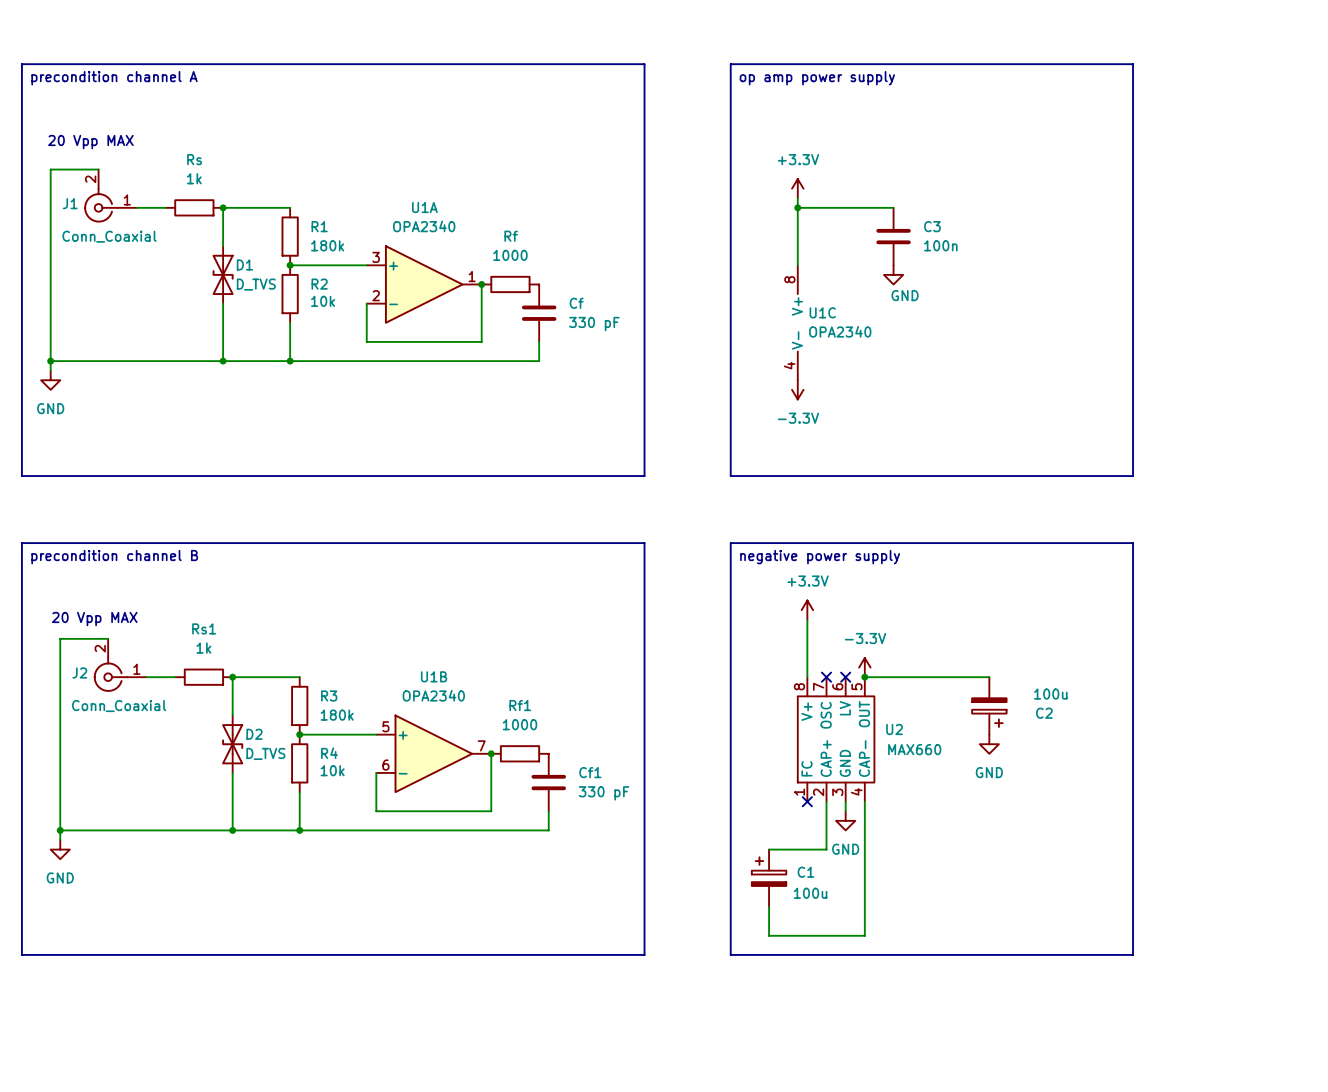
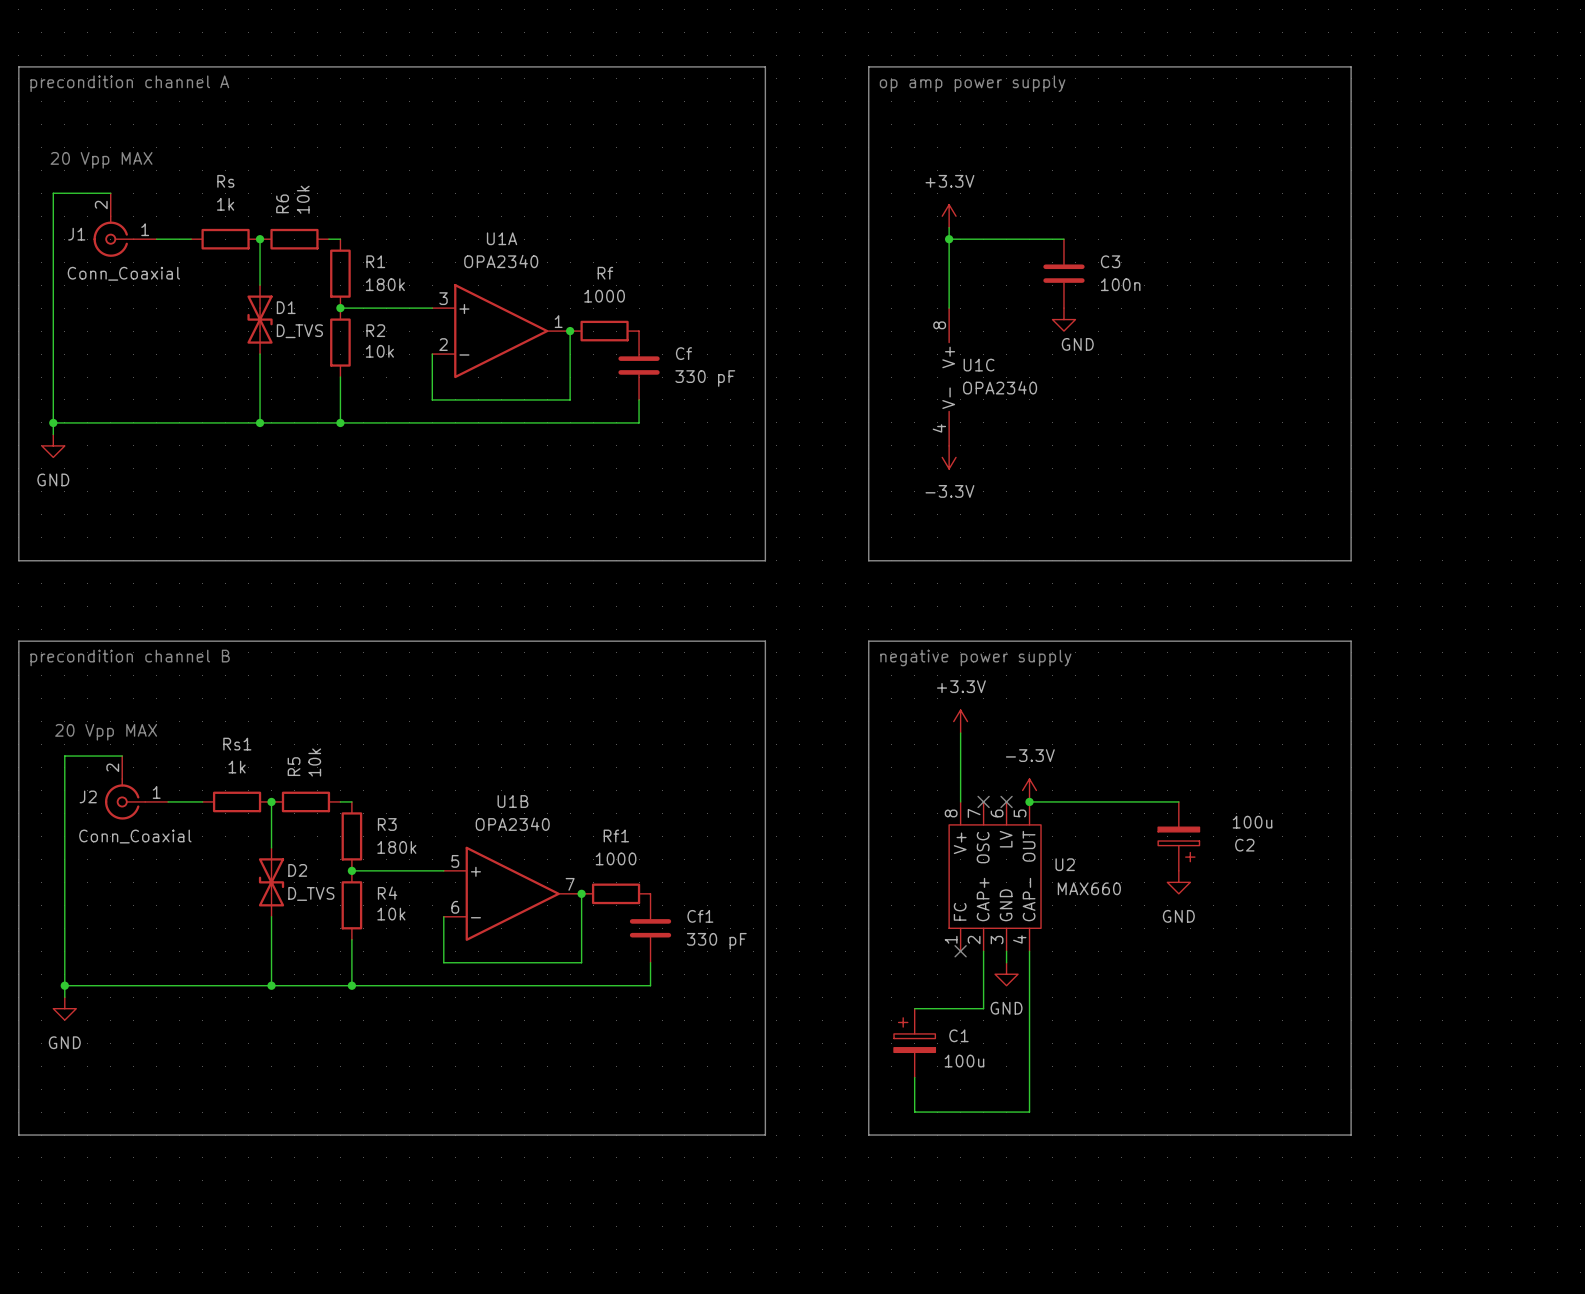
wire: (223, 207) (280, 207) -> none
R6: none -> 10k (294, 239)
wire: (232, 677) (290, 677) -> none
R5: none -> 10k (305, 801)

